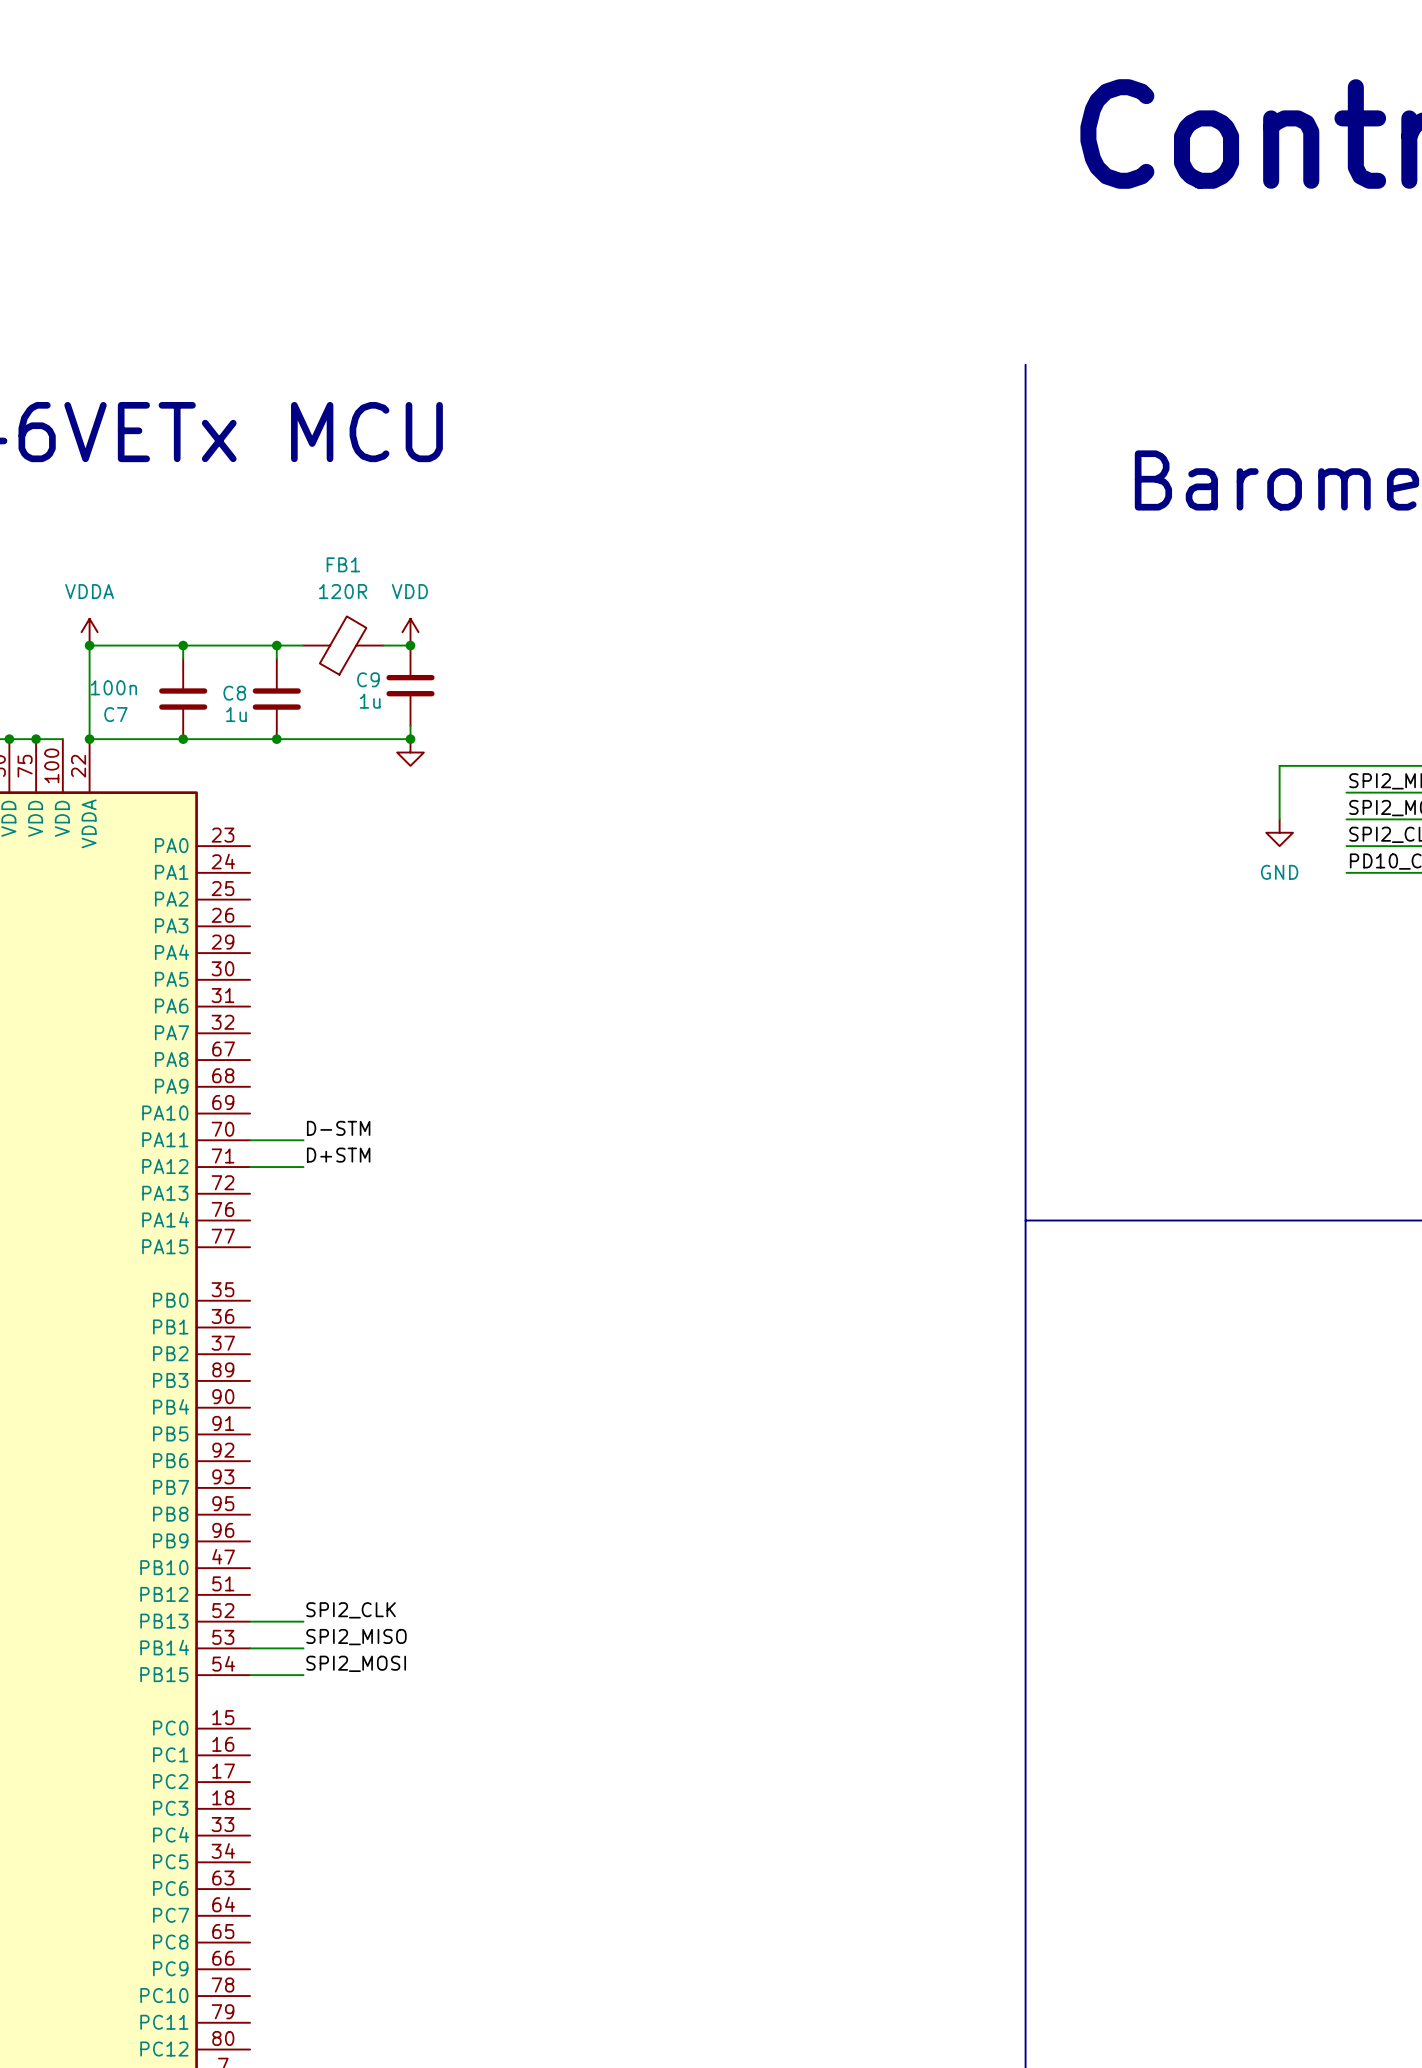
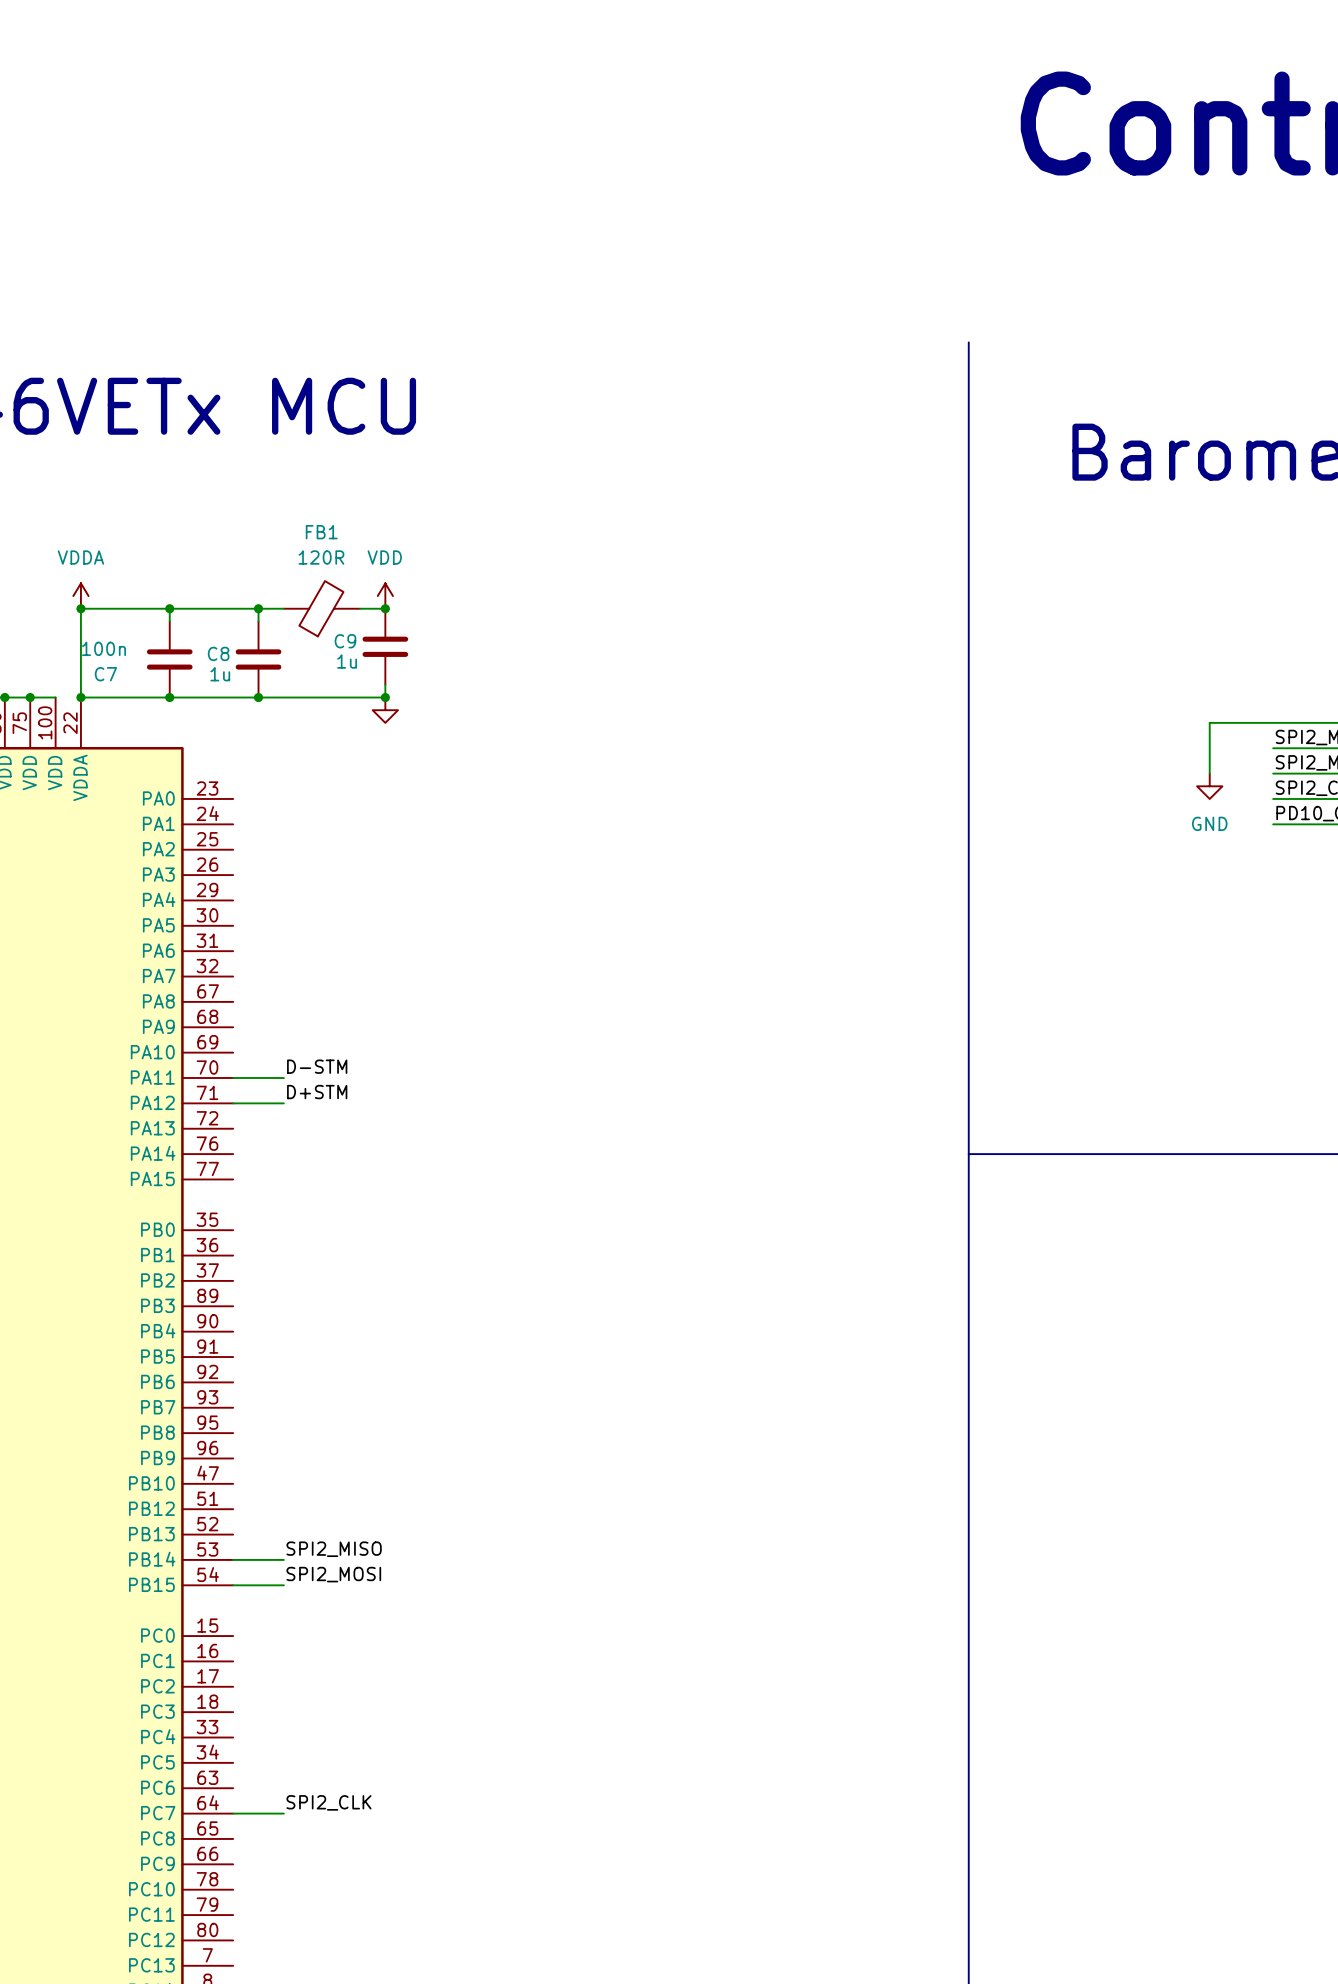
label: SPI2_CLK (351, 1610) -> none
wire: (250, 1621) (303, 1621) -> none
label: none -> SPI2_CLK (328, 1802)
wire: none -> (233, 1813) (283, 1813)

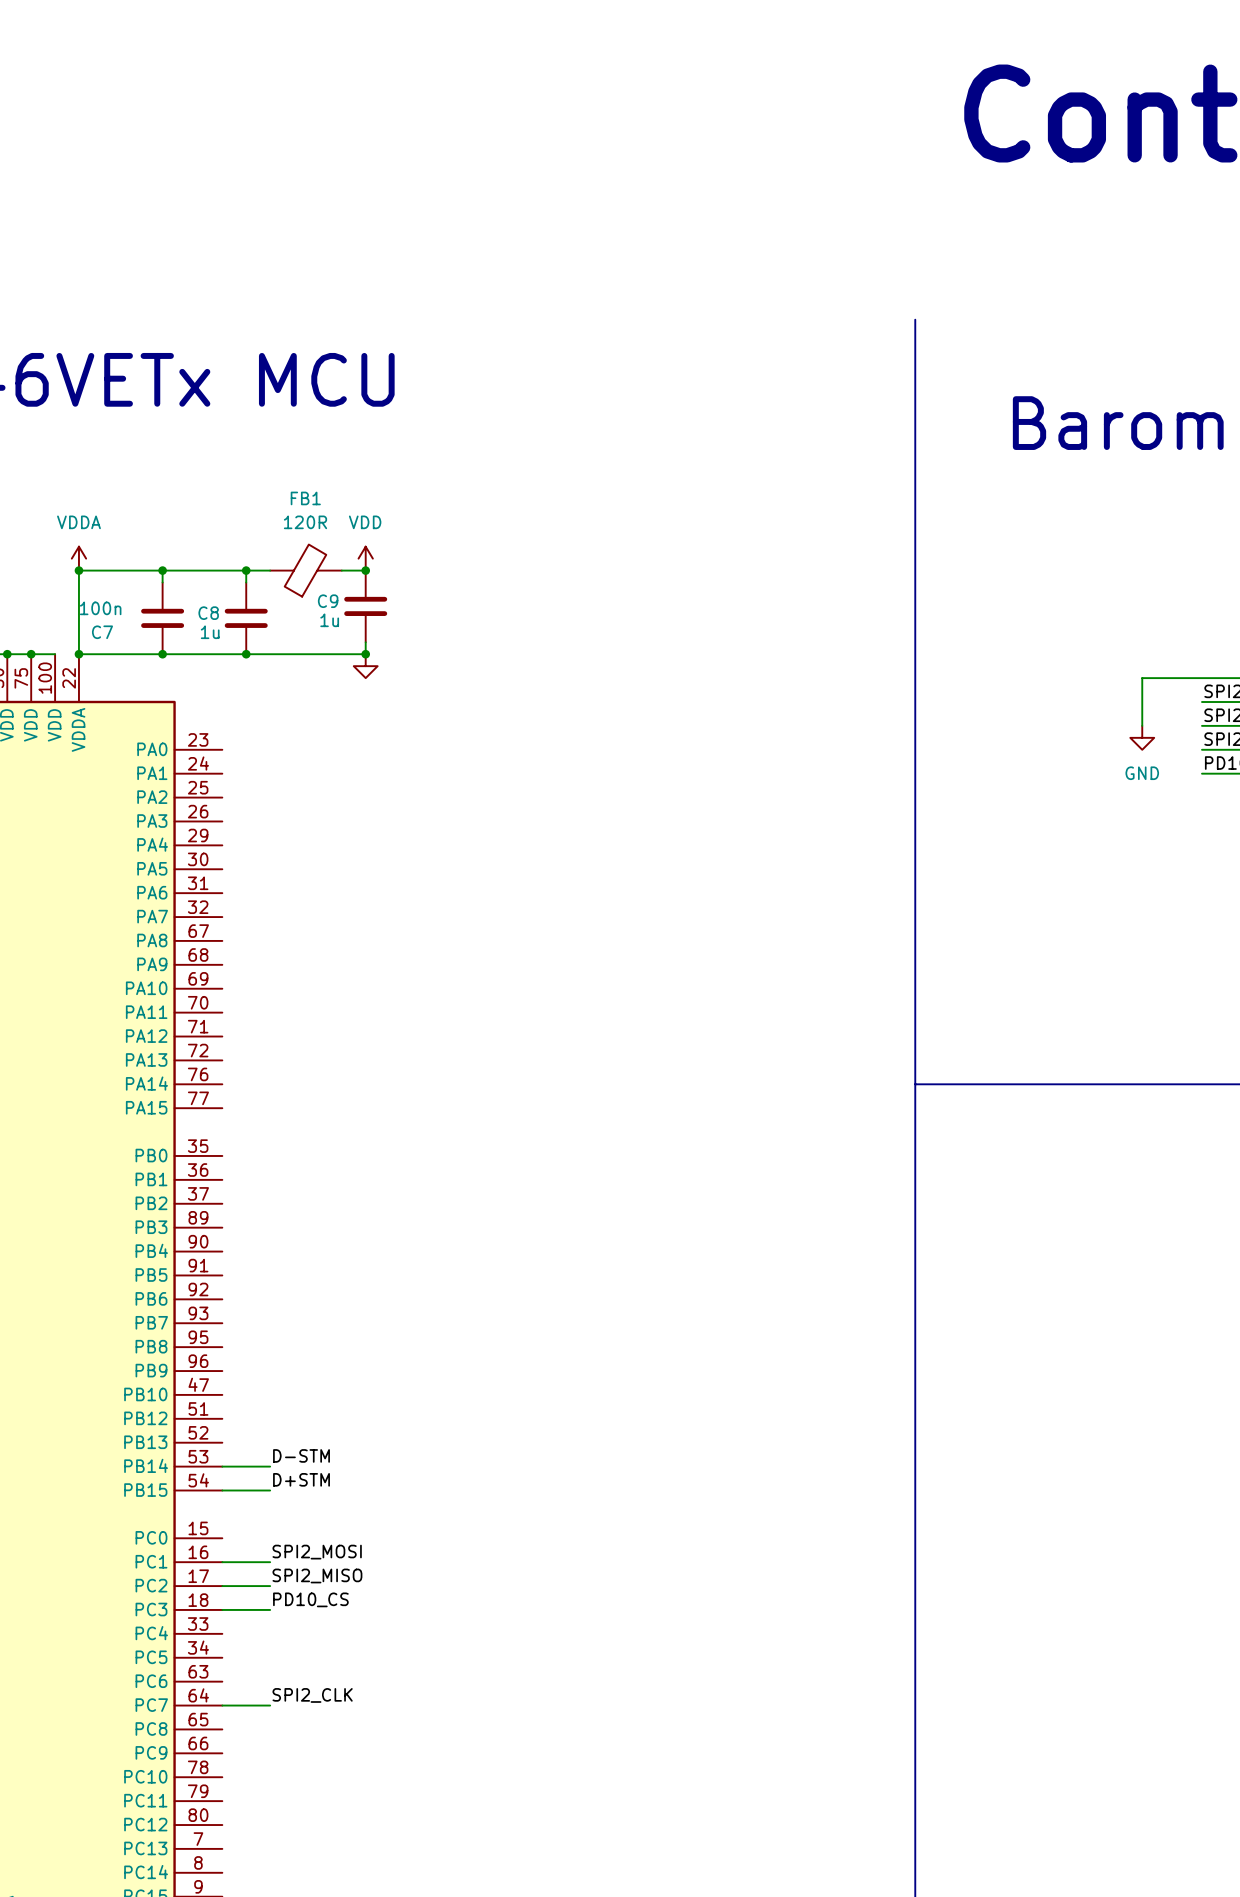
label: D-STM (317, 1066) -> none
wire: (233, 1078) (283, 1078) -> none
label: D+STM (317, 1092) -> none
wire: (233, 1103) (283, 1103) -> none
label: SPI2_MISO (334, 1549) -> D-STM (301, 1455)
label: SPI2_MOSI (333, 1574) -> D+STM (301, 1479)
label: none -> SPI2_MOSI (317, 1552)
wire: none -> (222, 1562) (270, 1562)
label: none -> SPI2_MISO (317, 1575)
wire: none -> (222, 1586) (270, 1586)
label: none -> PD10_CS (310, 1599)
wire: none -> (222, 1609) (270, 1609)

